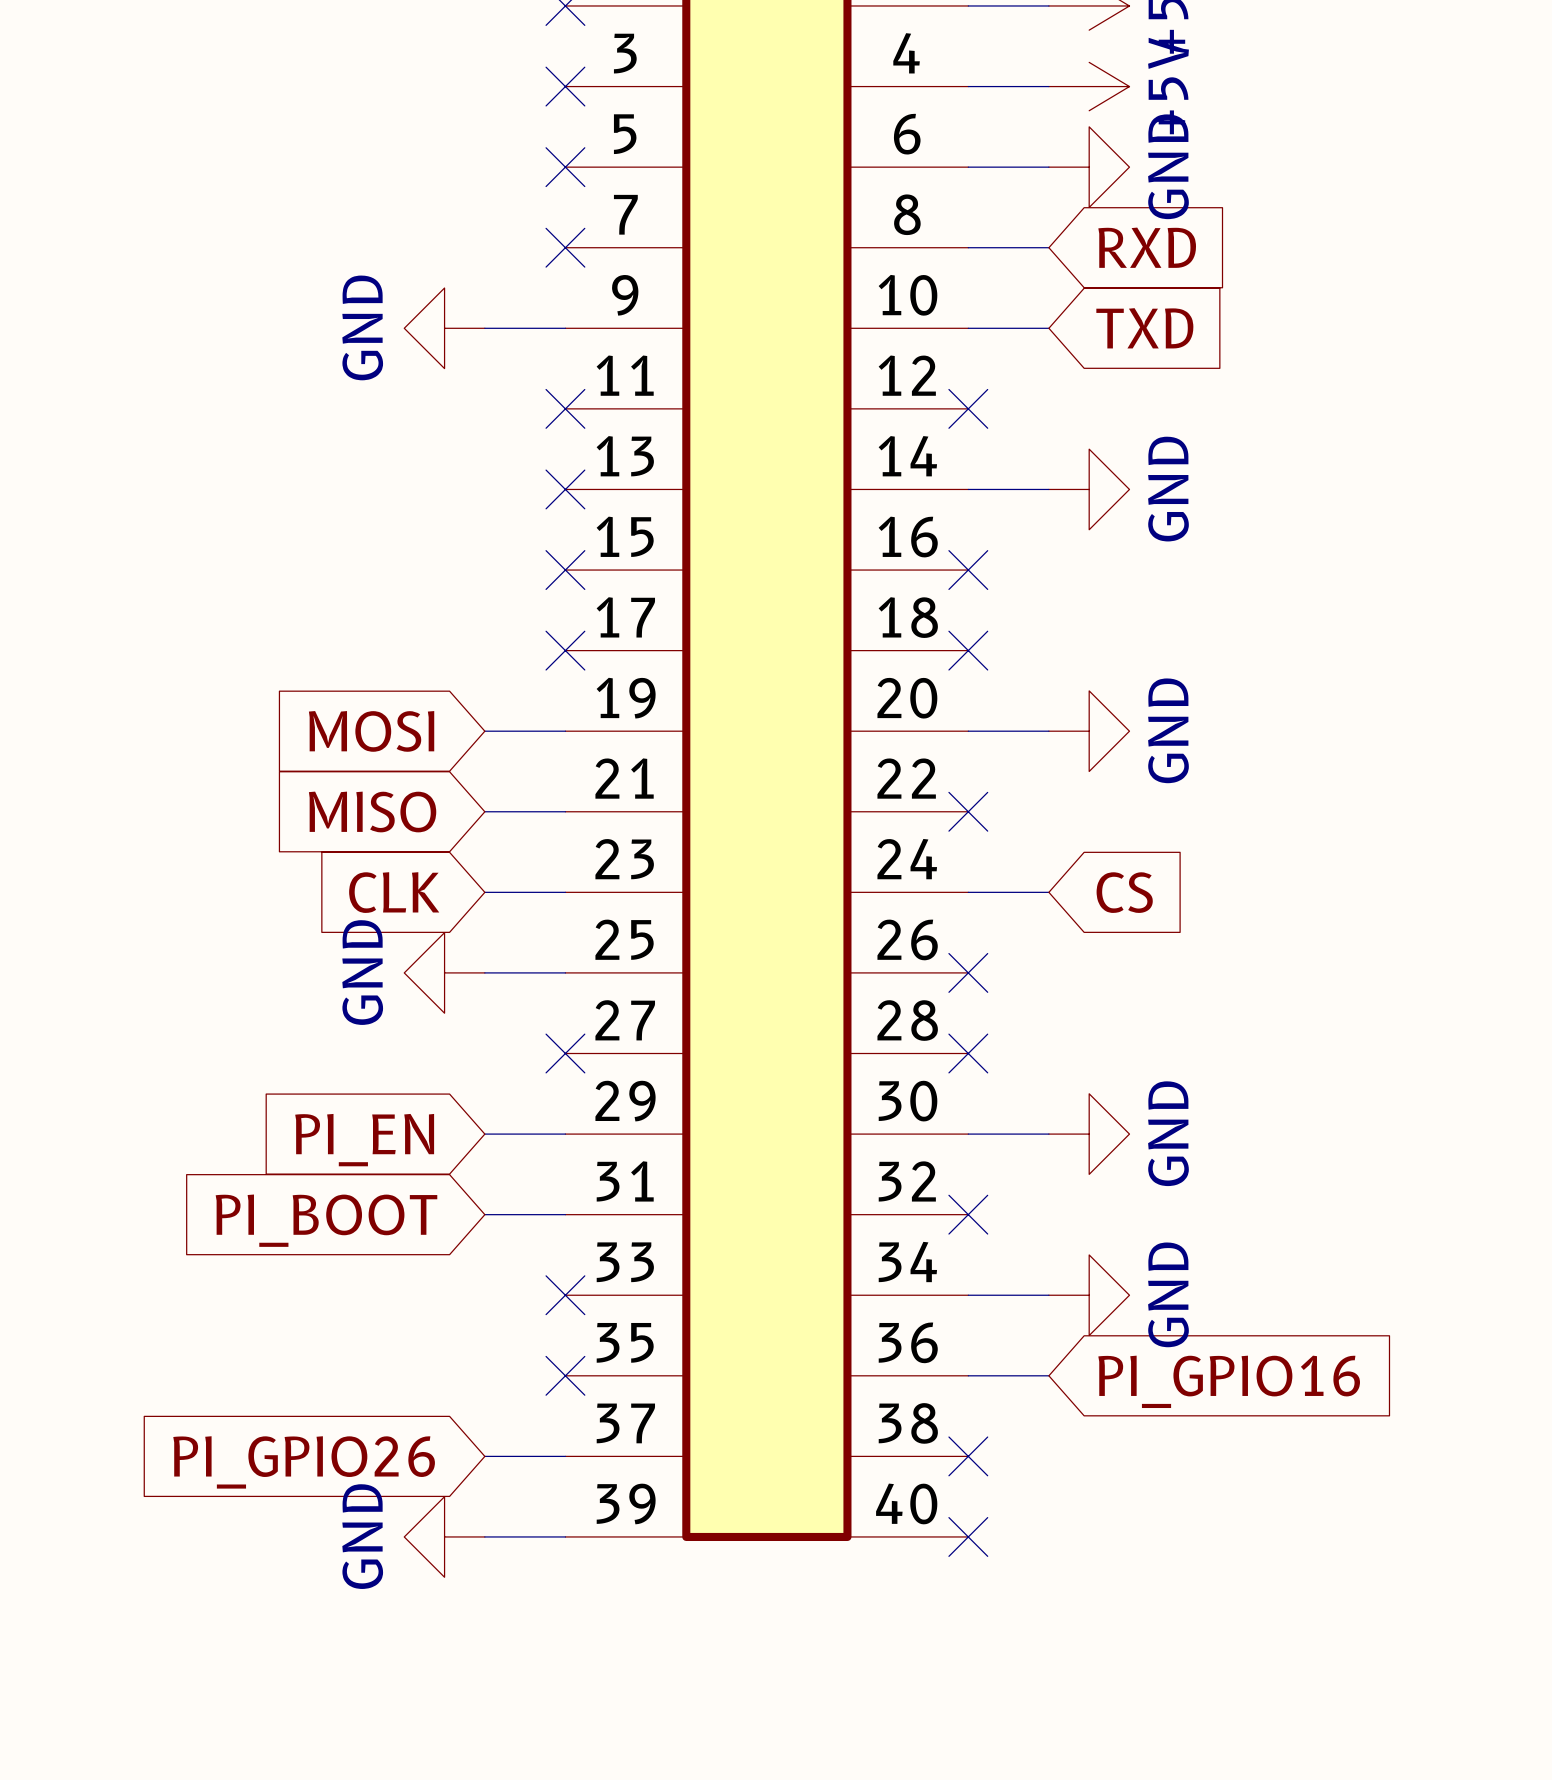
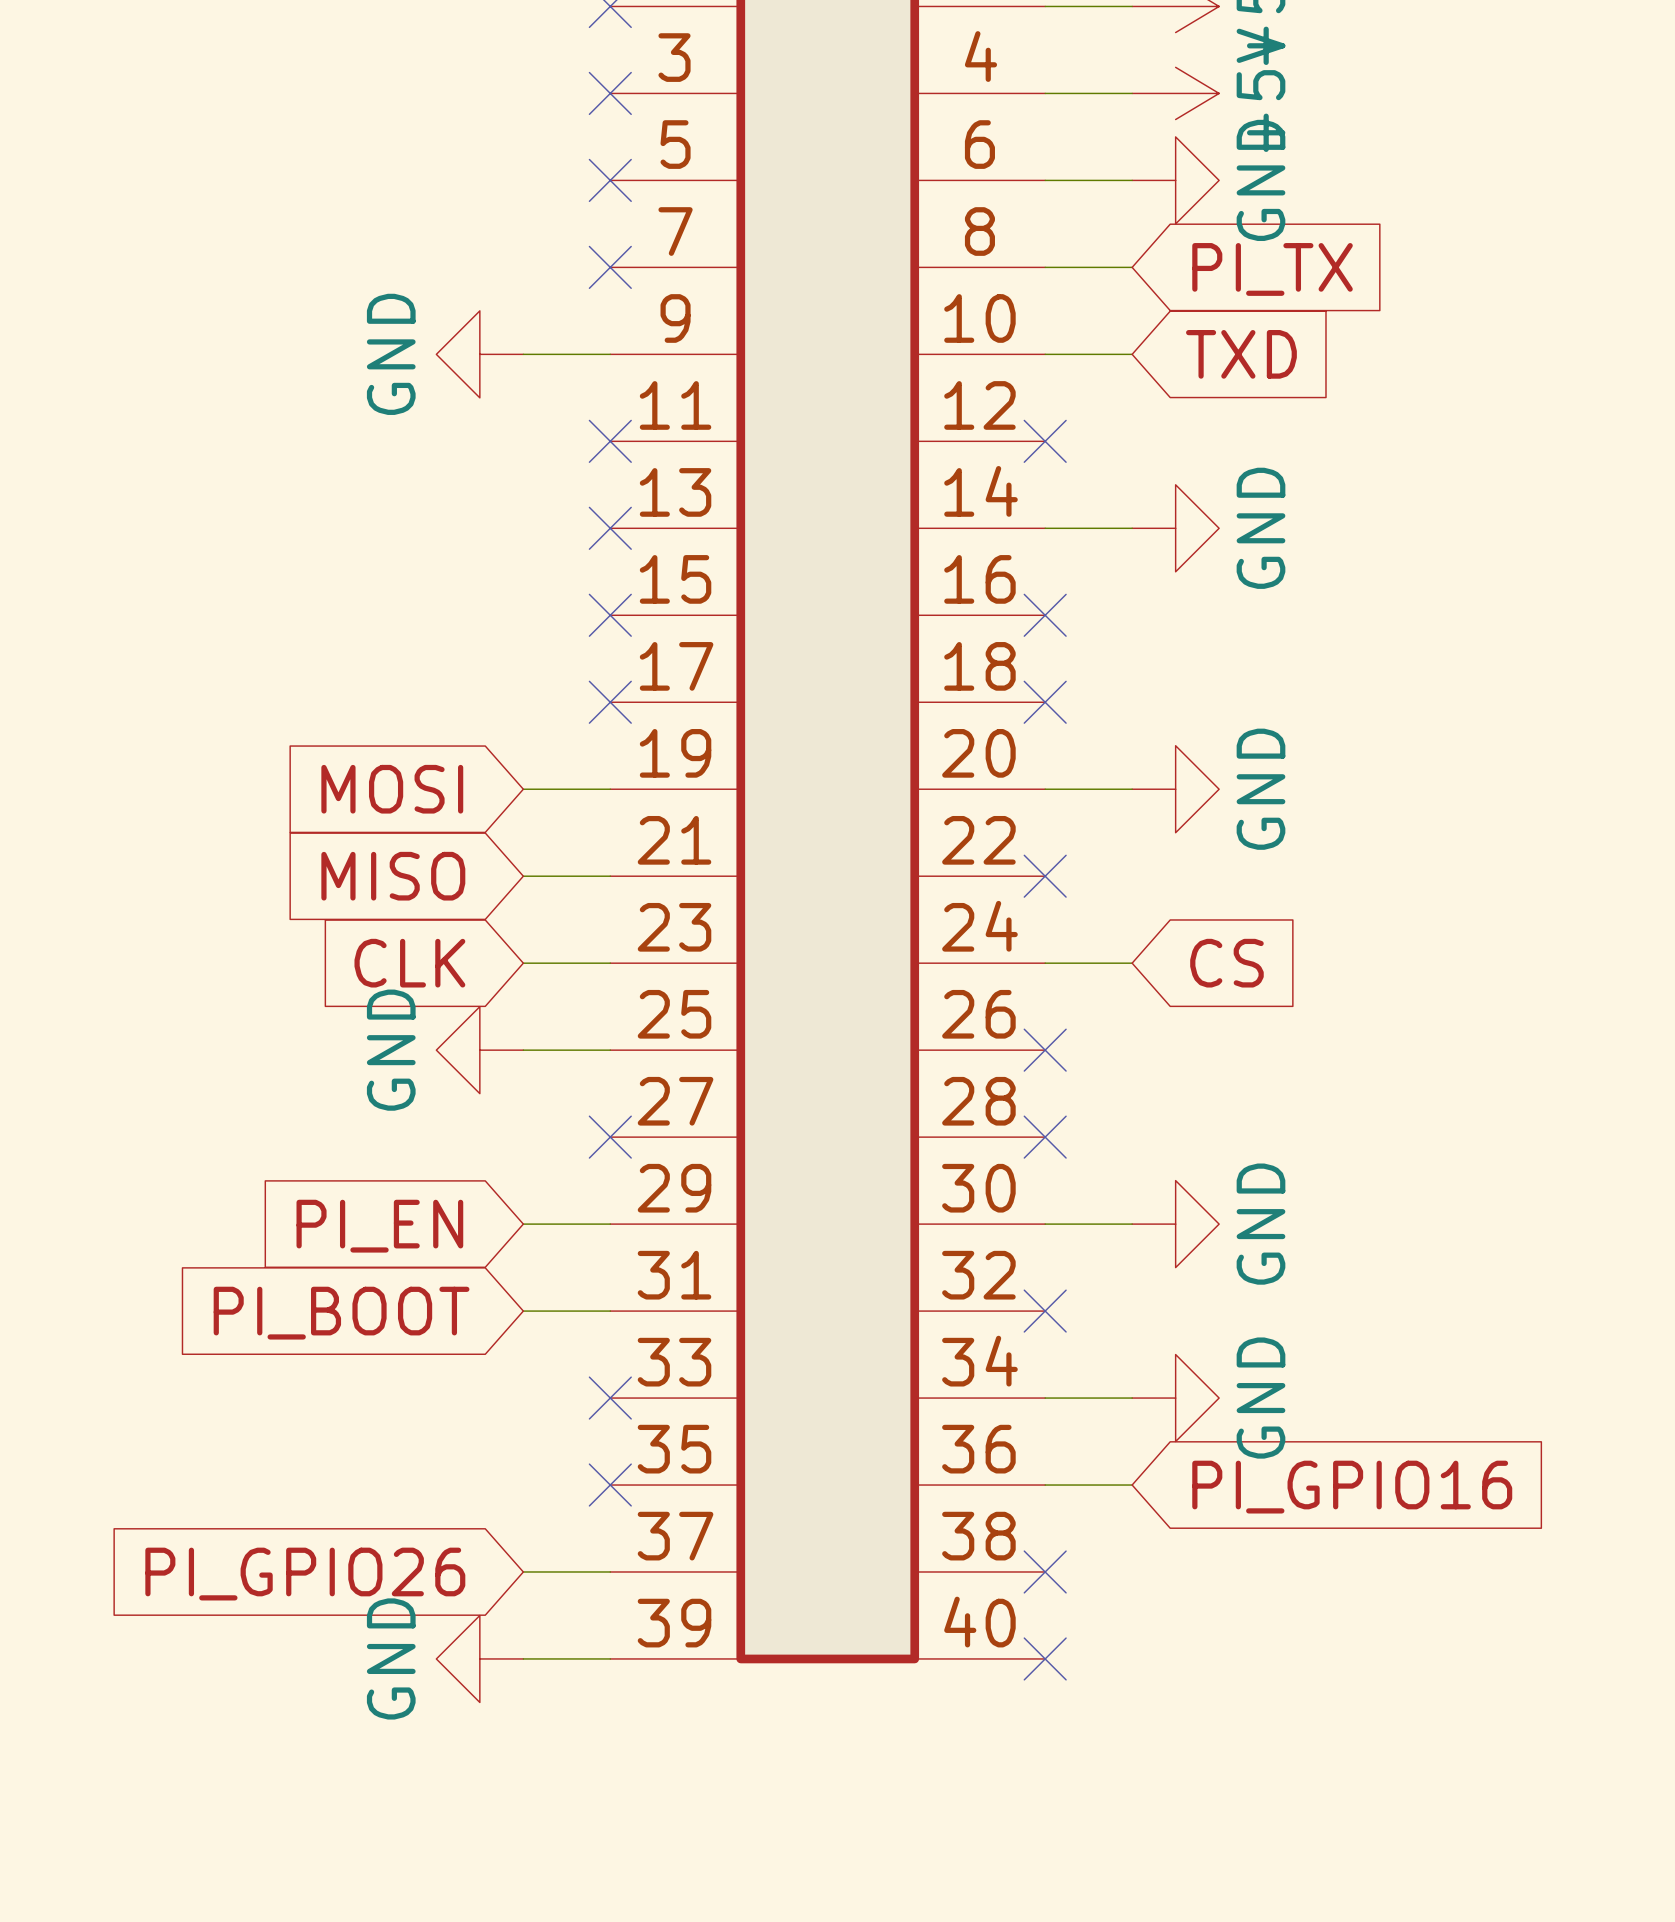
global label: RXD (1147, 247) -> PI_TX (1272, 269)

